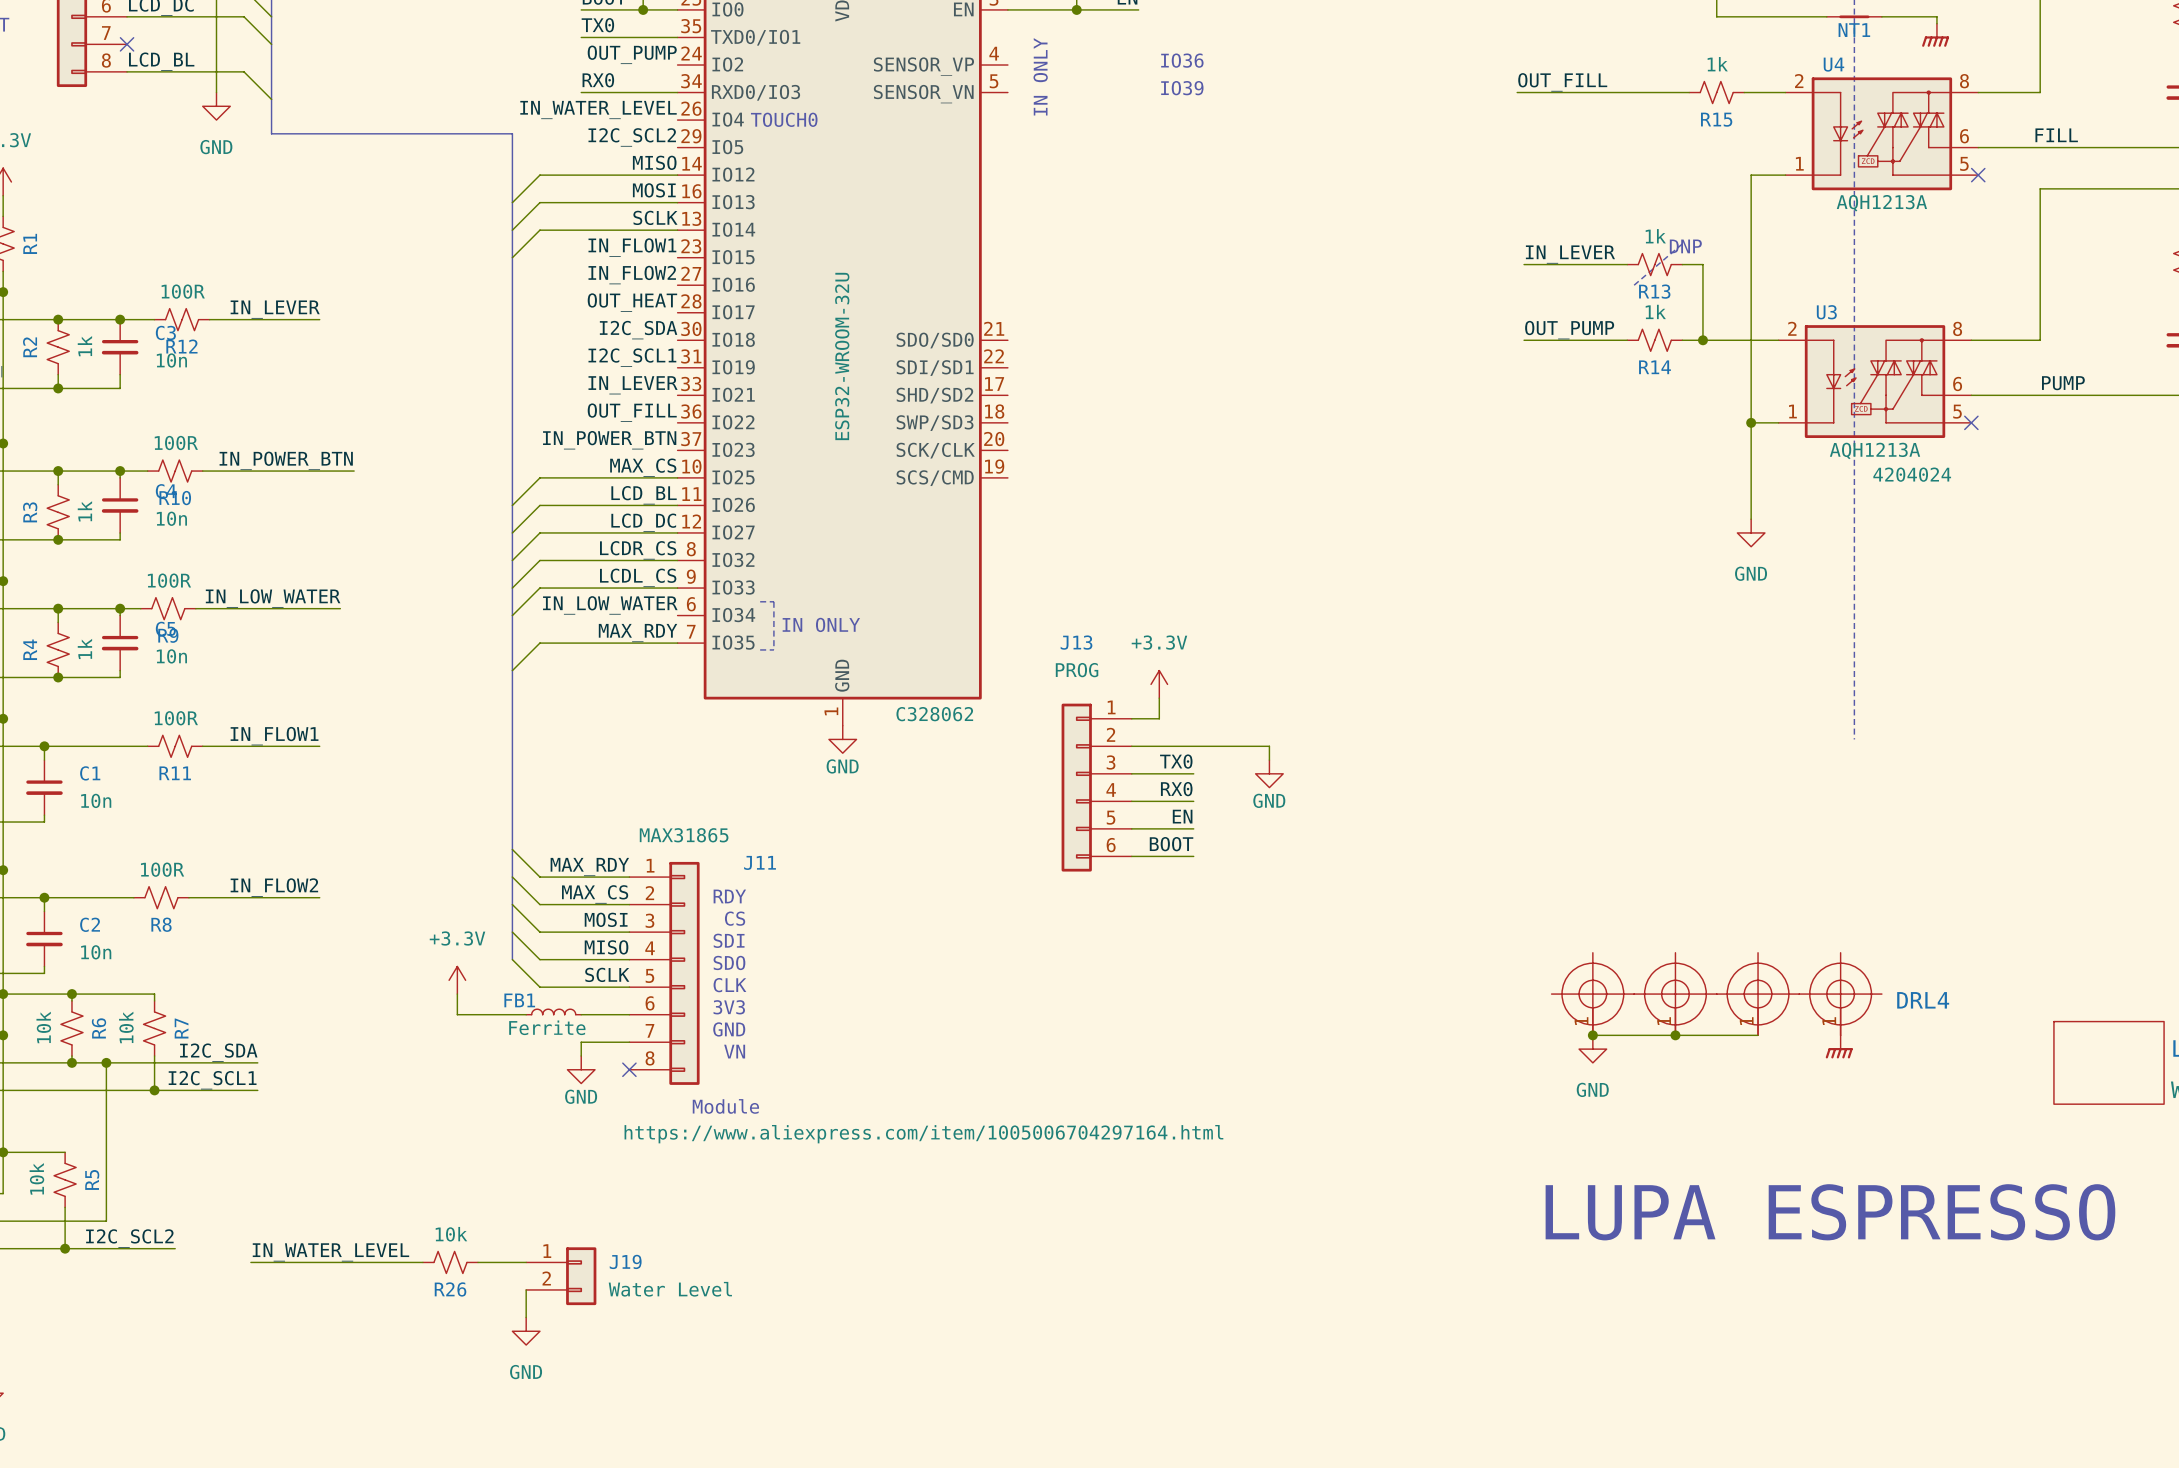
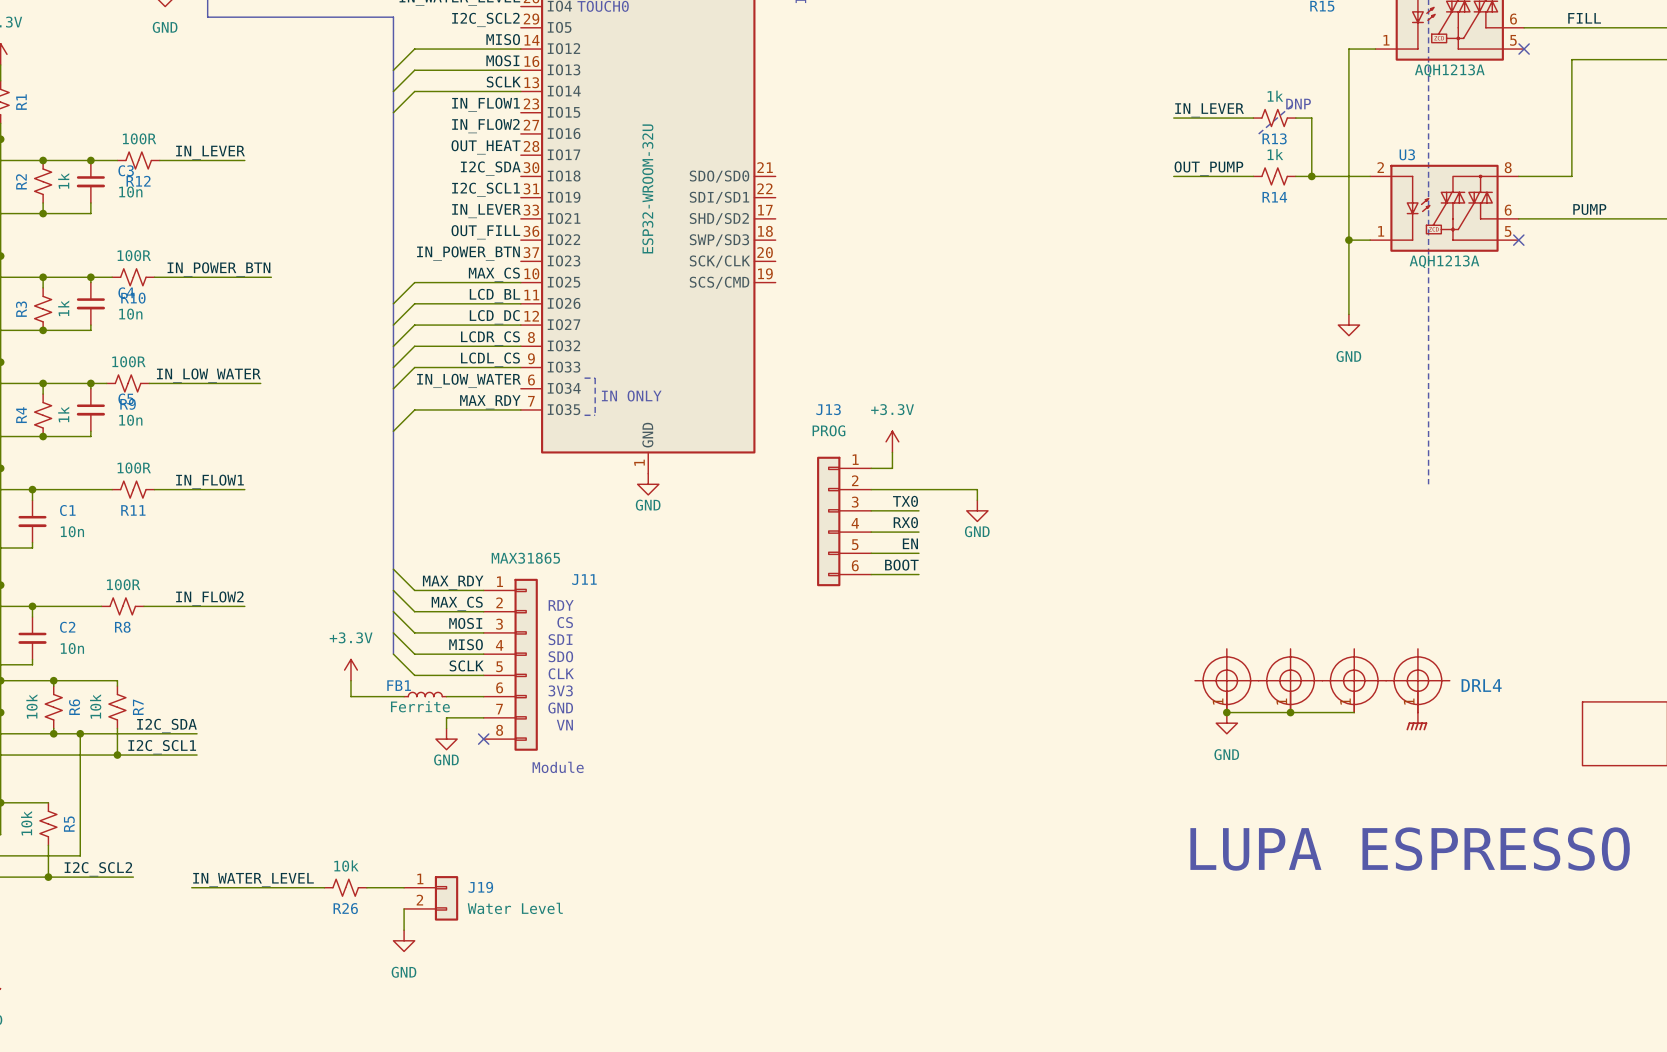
U3 text: 4204024 (1912, 474) -> none
part text: C328062 (934, 714) -> none
J11 text: https://www.aliexpress.com/item/1005006704297164.html (923, 1134) -> none

